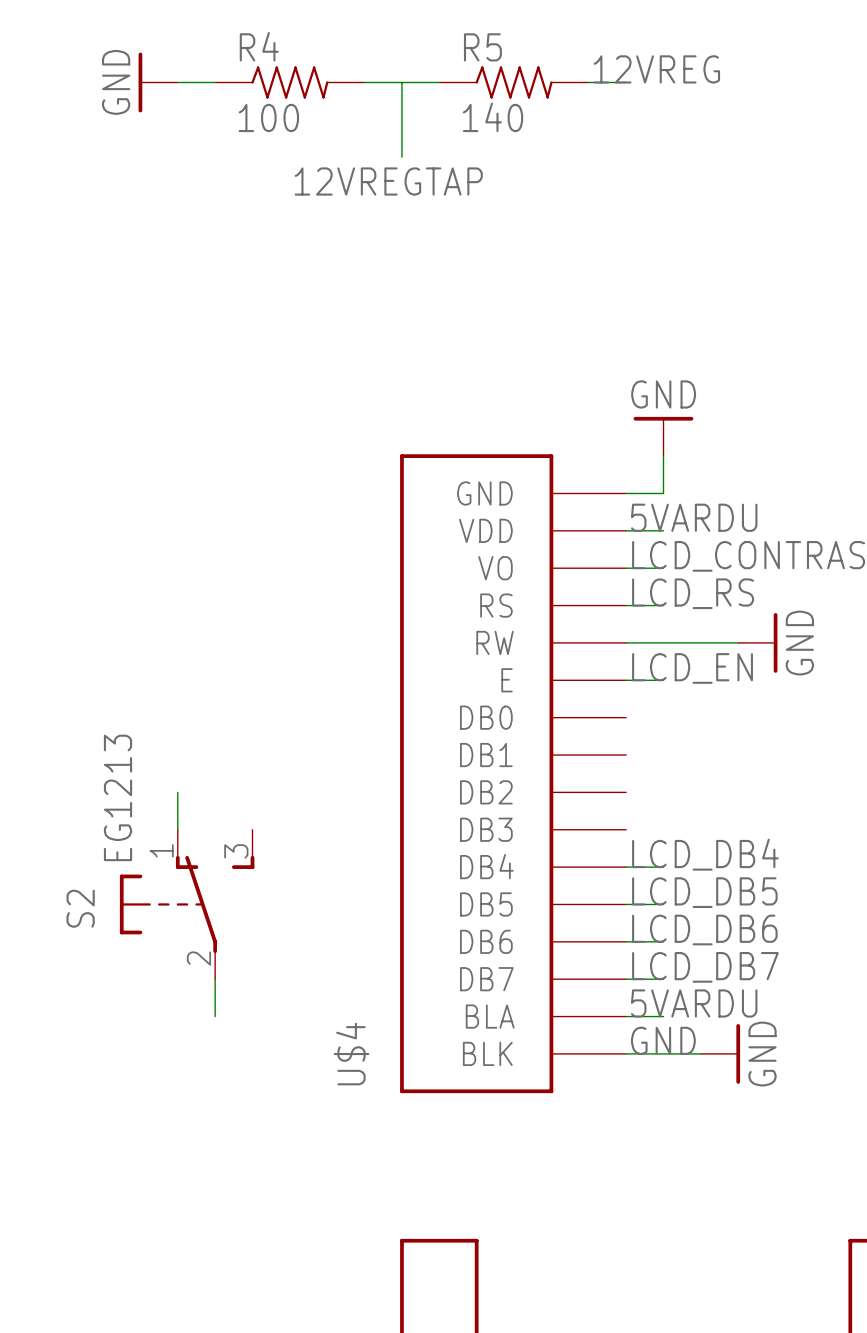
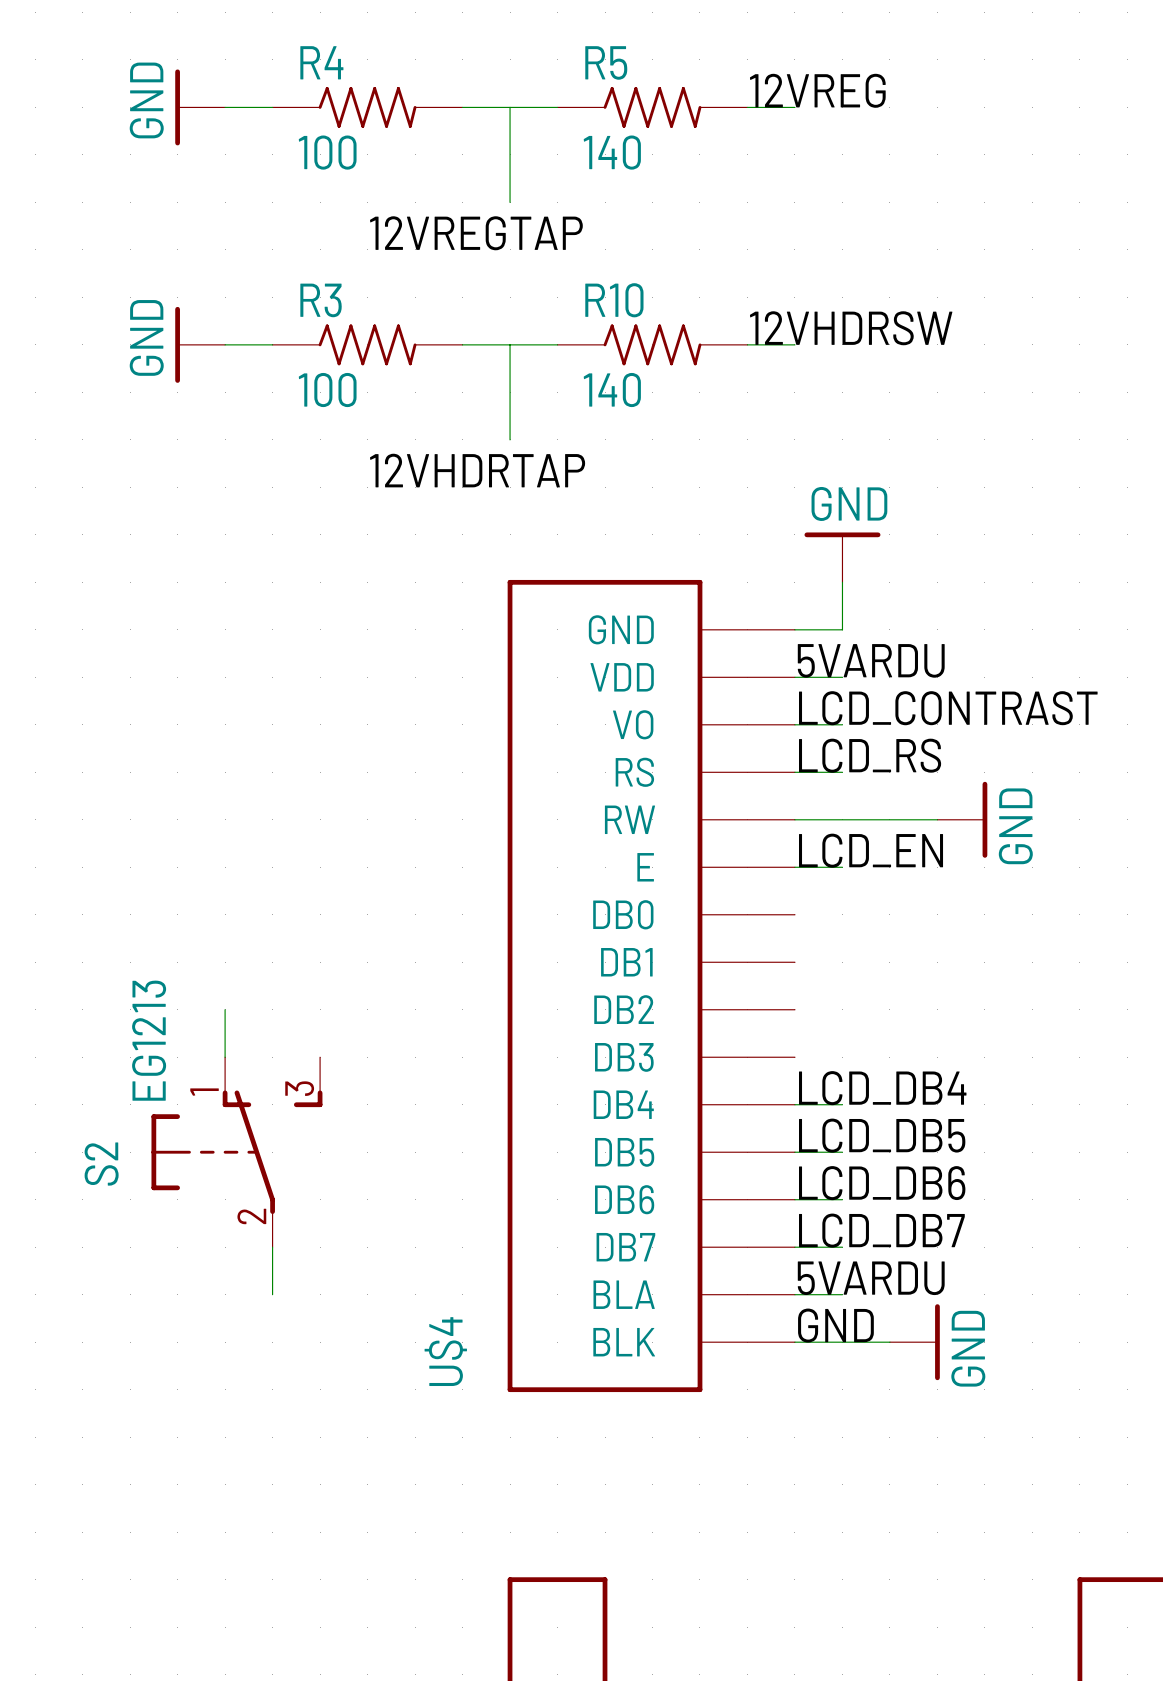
label: none -> 12VHDRSW (851, 328)
power symbol: none -> GND (200, 344)
wire: none -> (225, 344) (272, 344)
R3: none -> 100 (367, 344)
wire: none -> (462, 344) (557, 344)
wire: none -> (510, 344) (510, 439)
R10: none -> 140 (652, 344)
wire: none -> (747, 344) (794, 344)
label: none -> 12VHDRTAP (477, 470)

